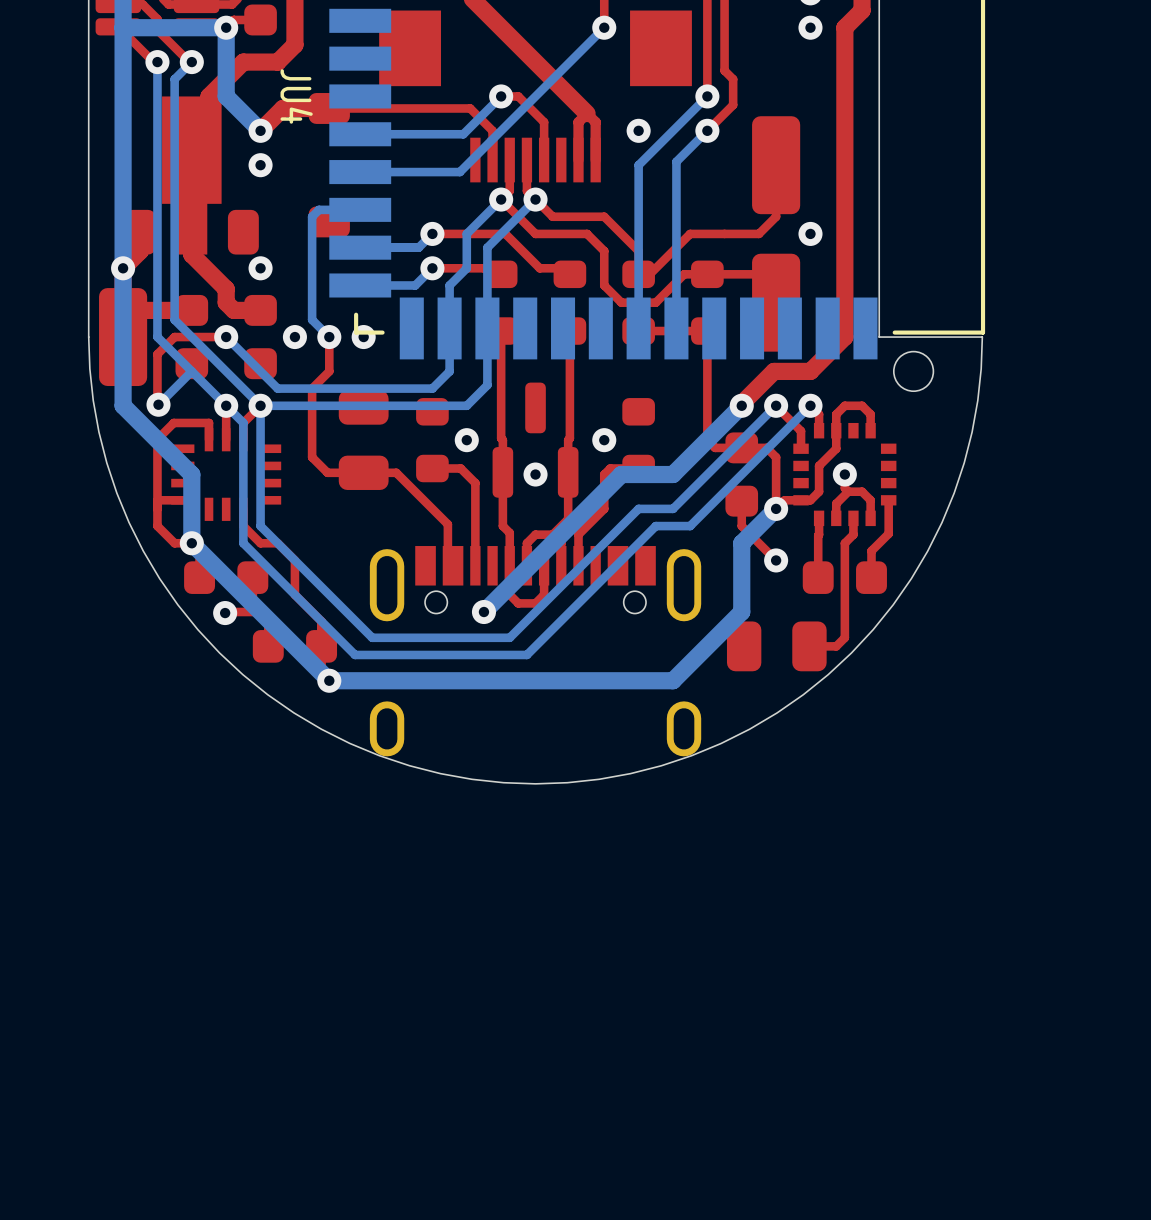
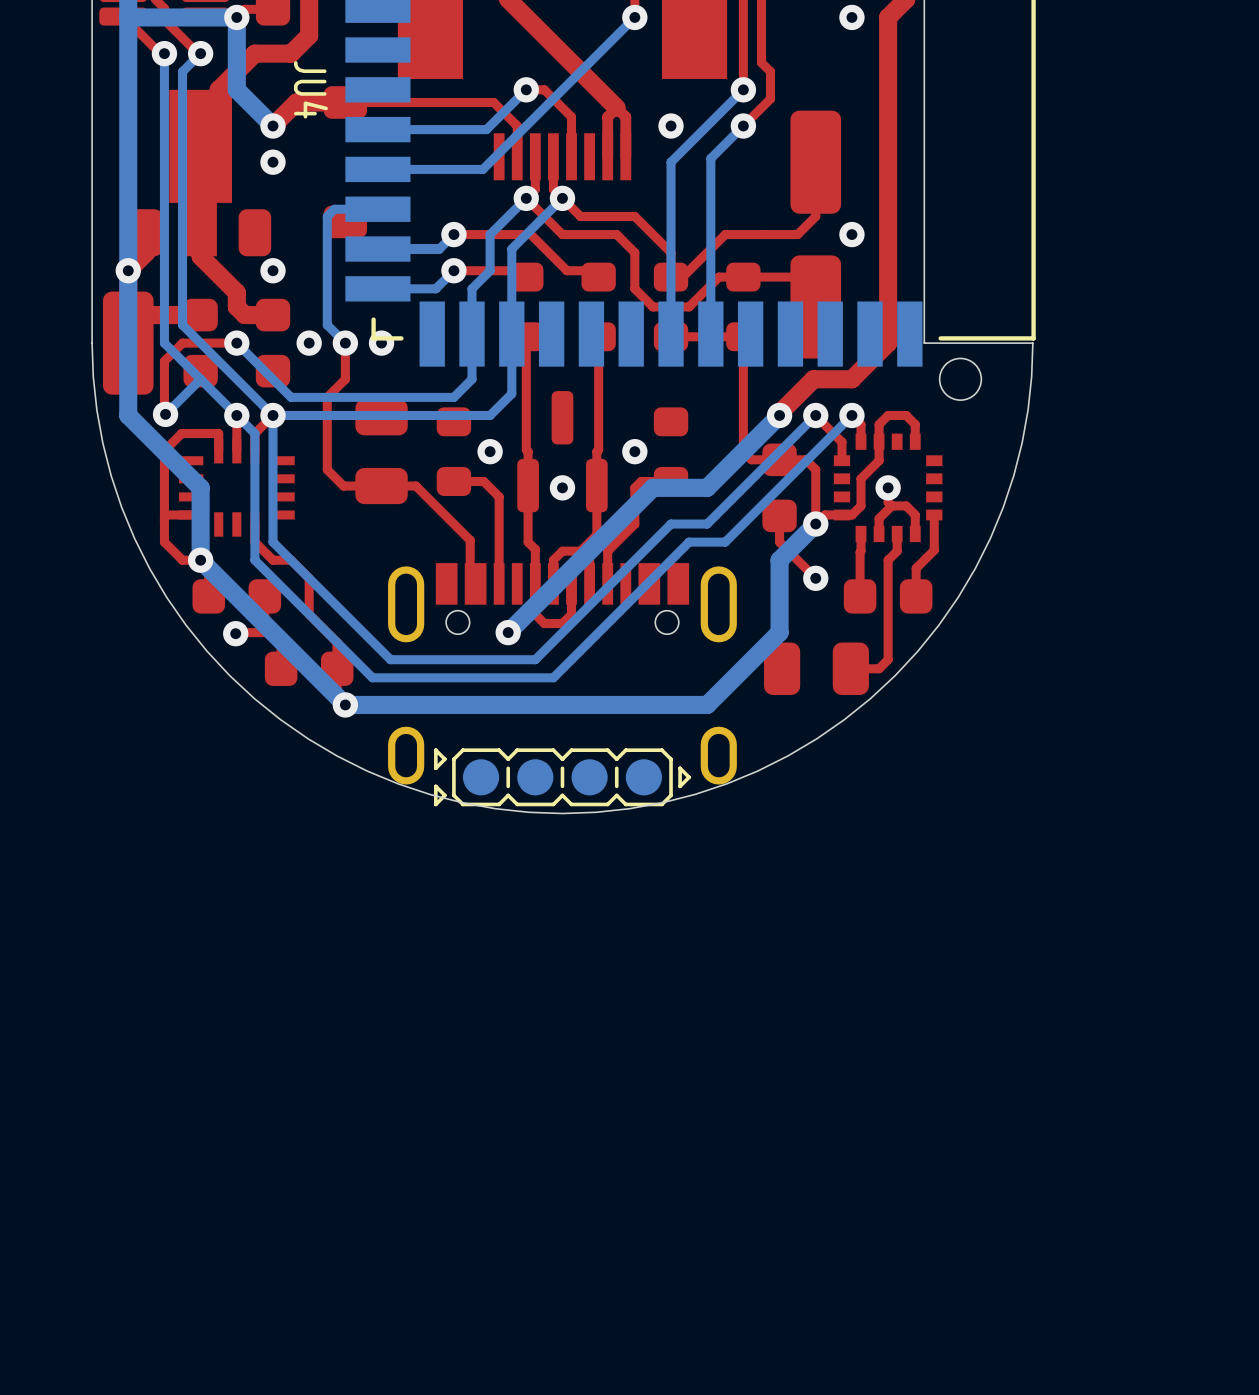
drawing: none -> [434, 748, 691, 807]

